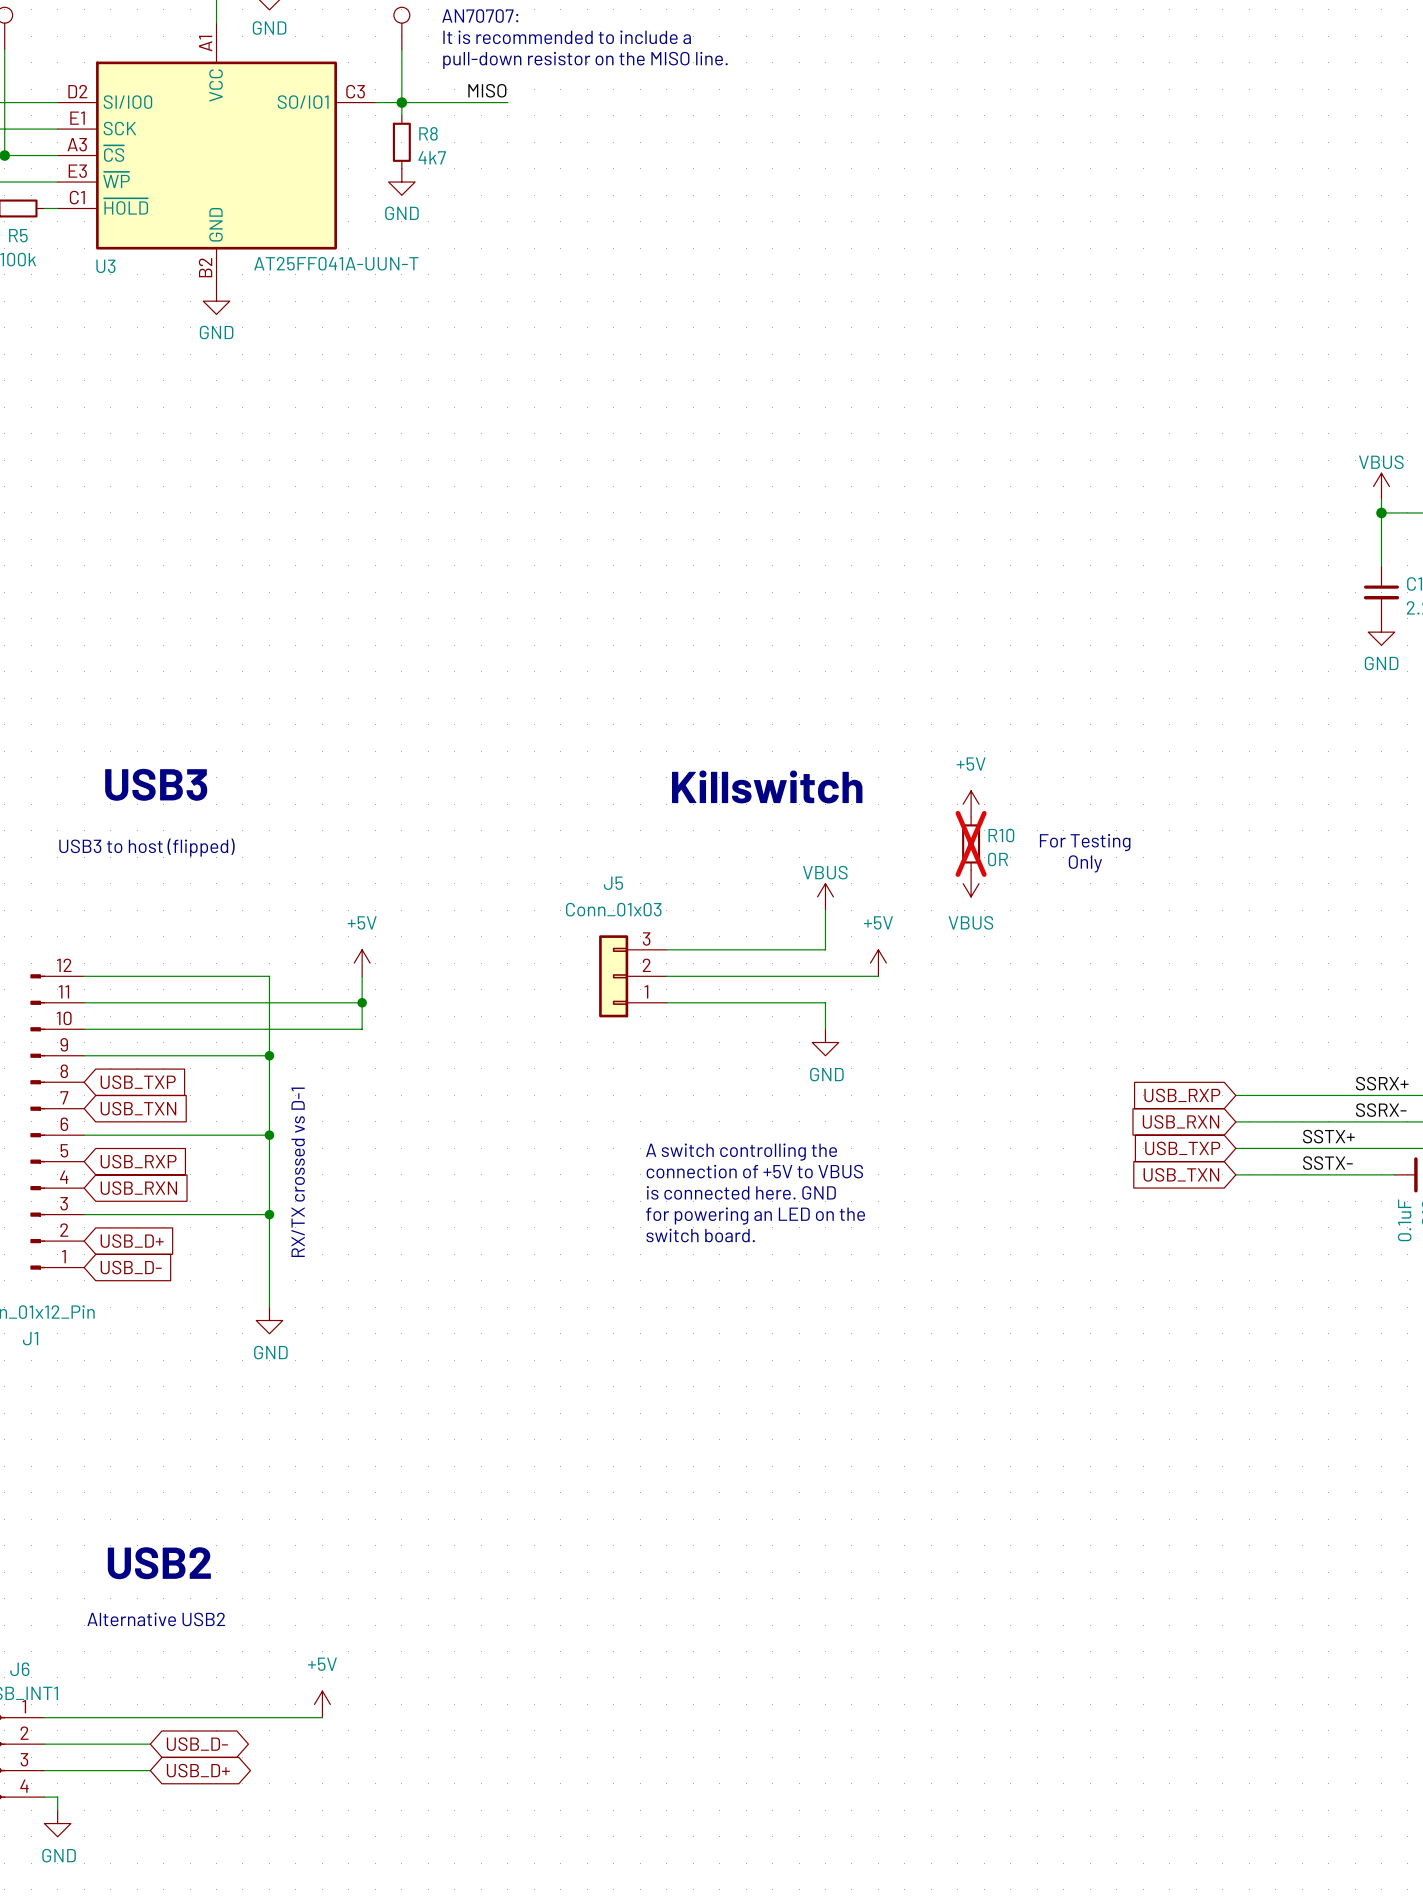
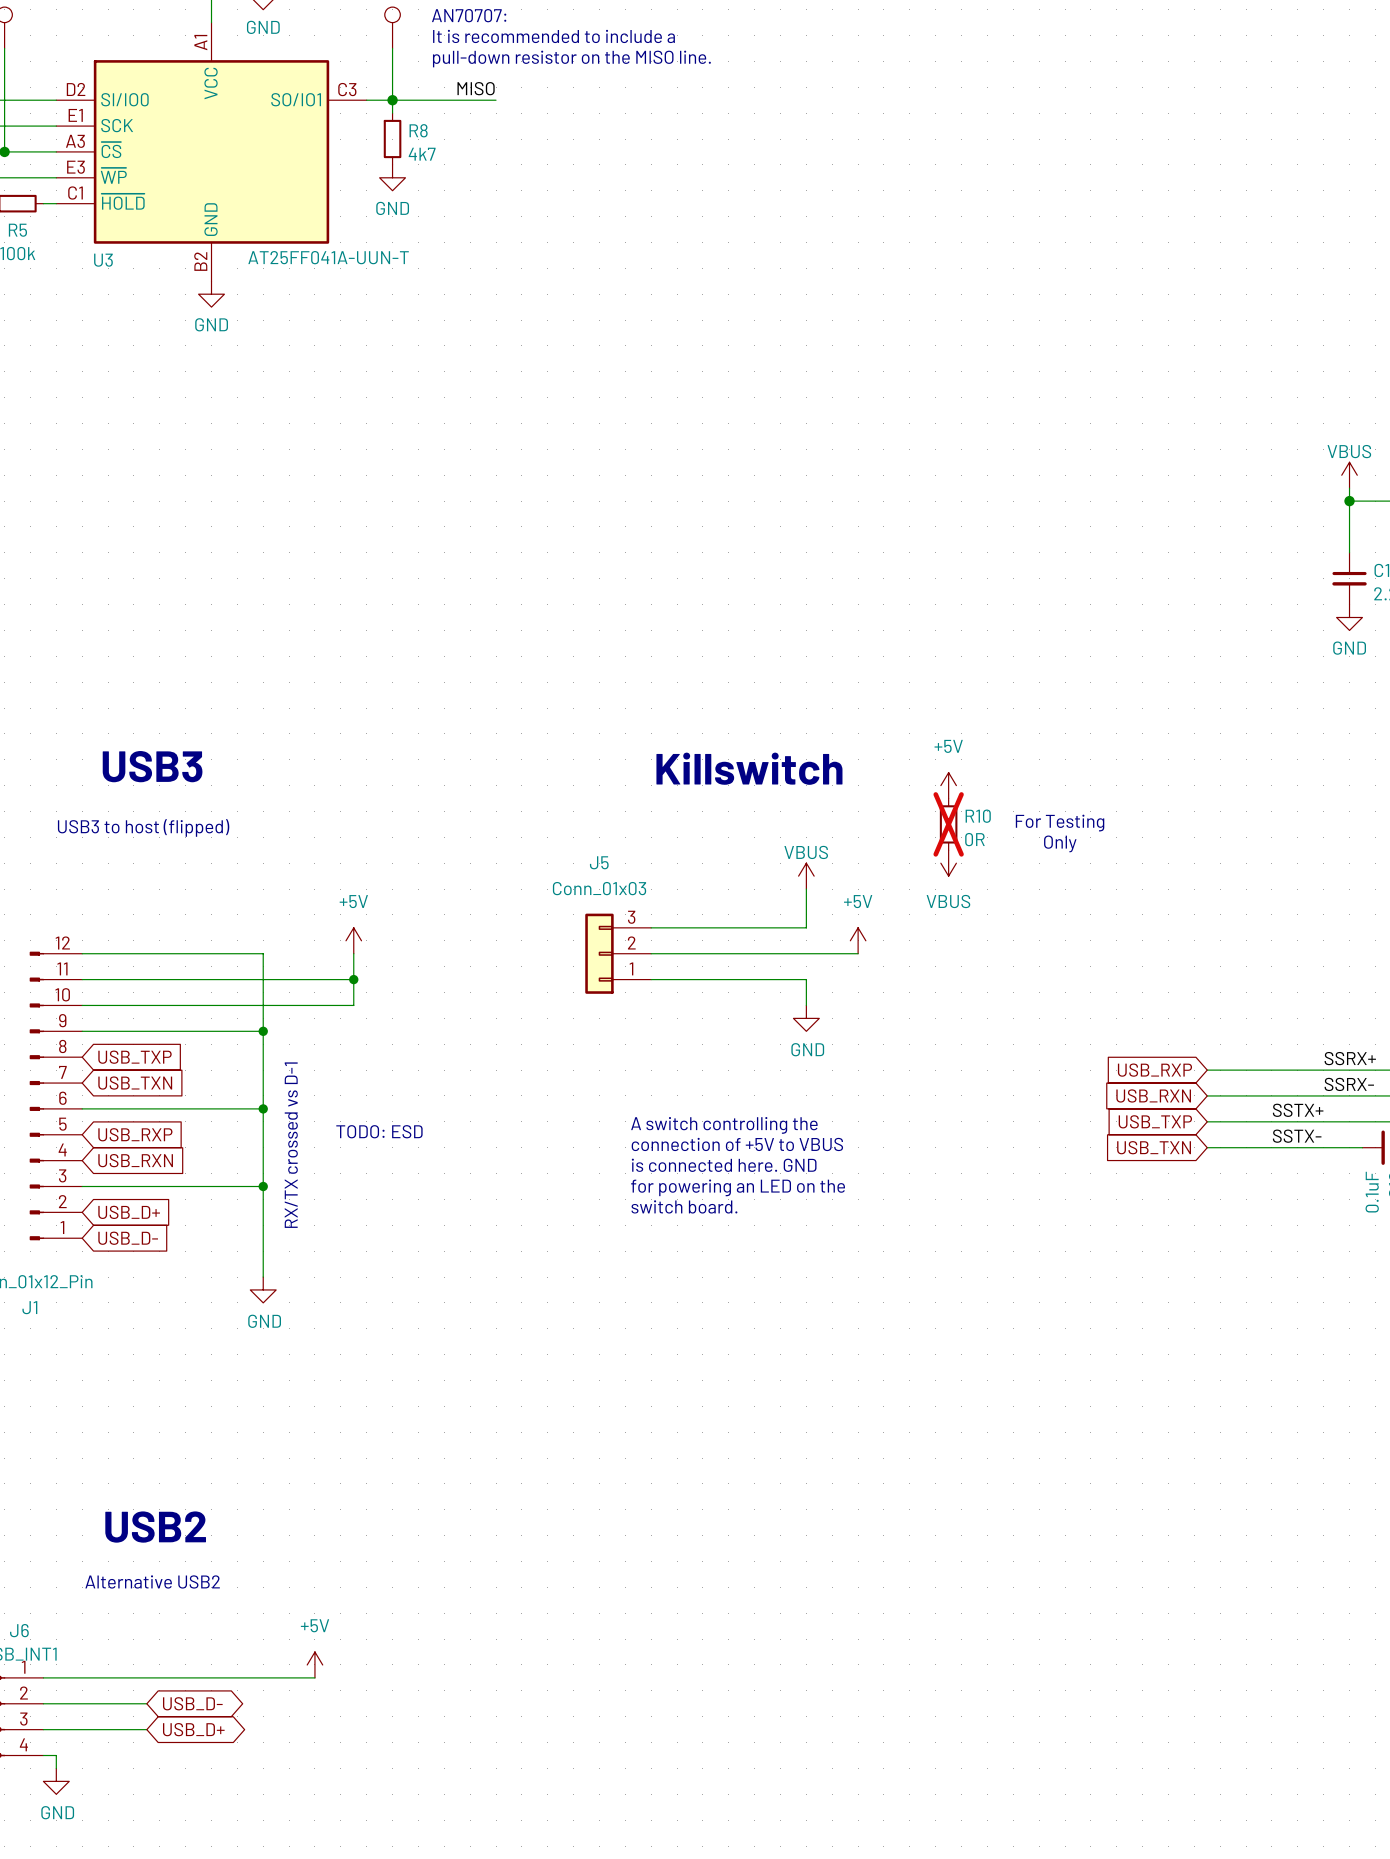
text: none -> TODO: ESD (379, 1131)

